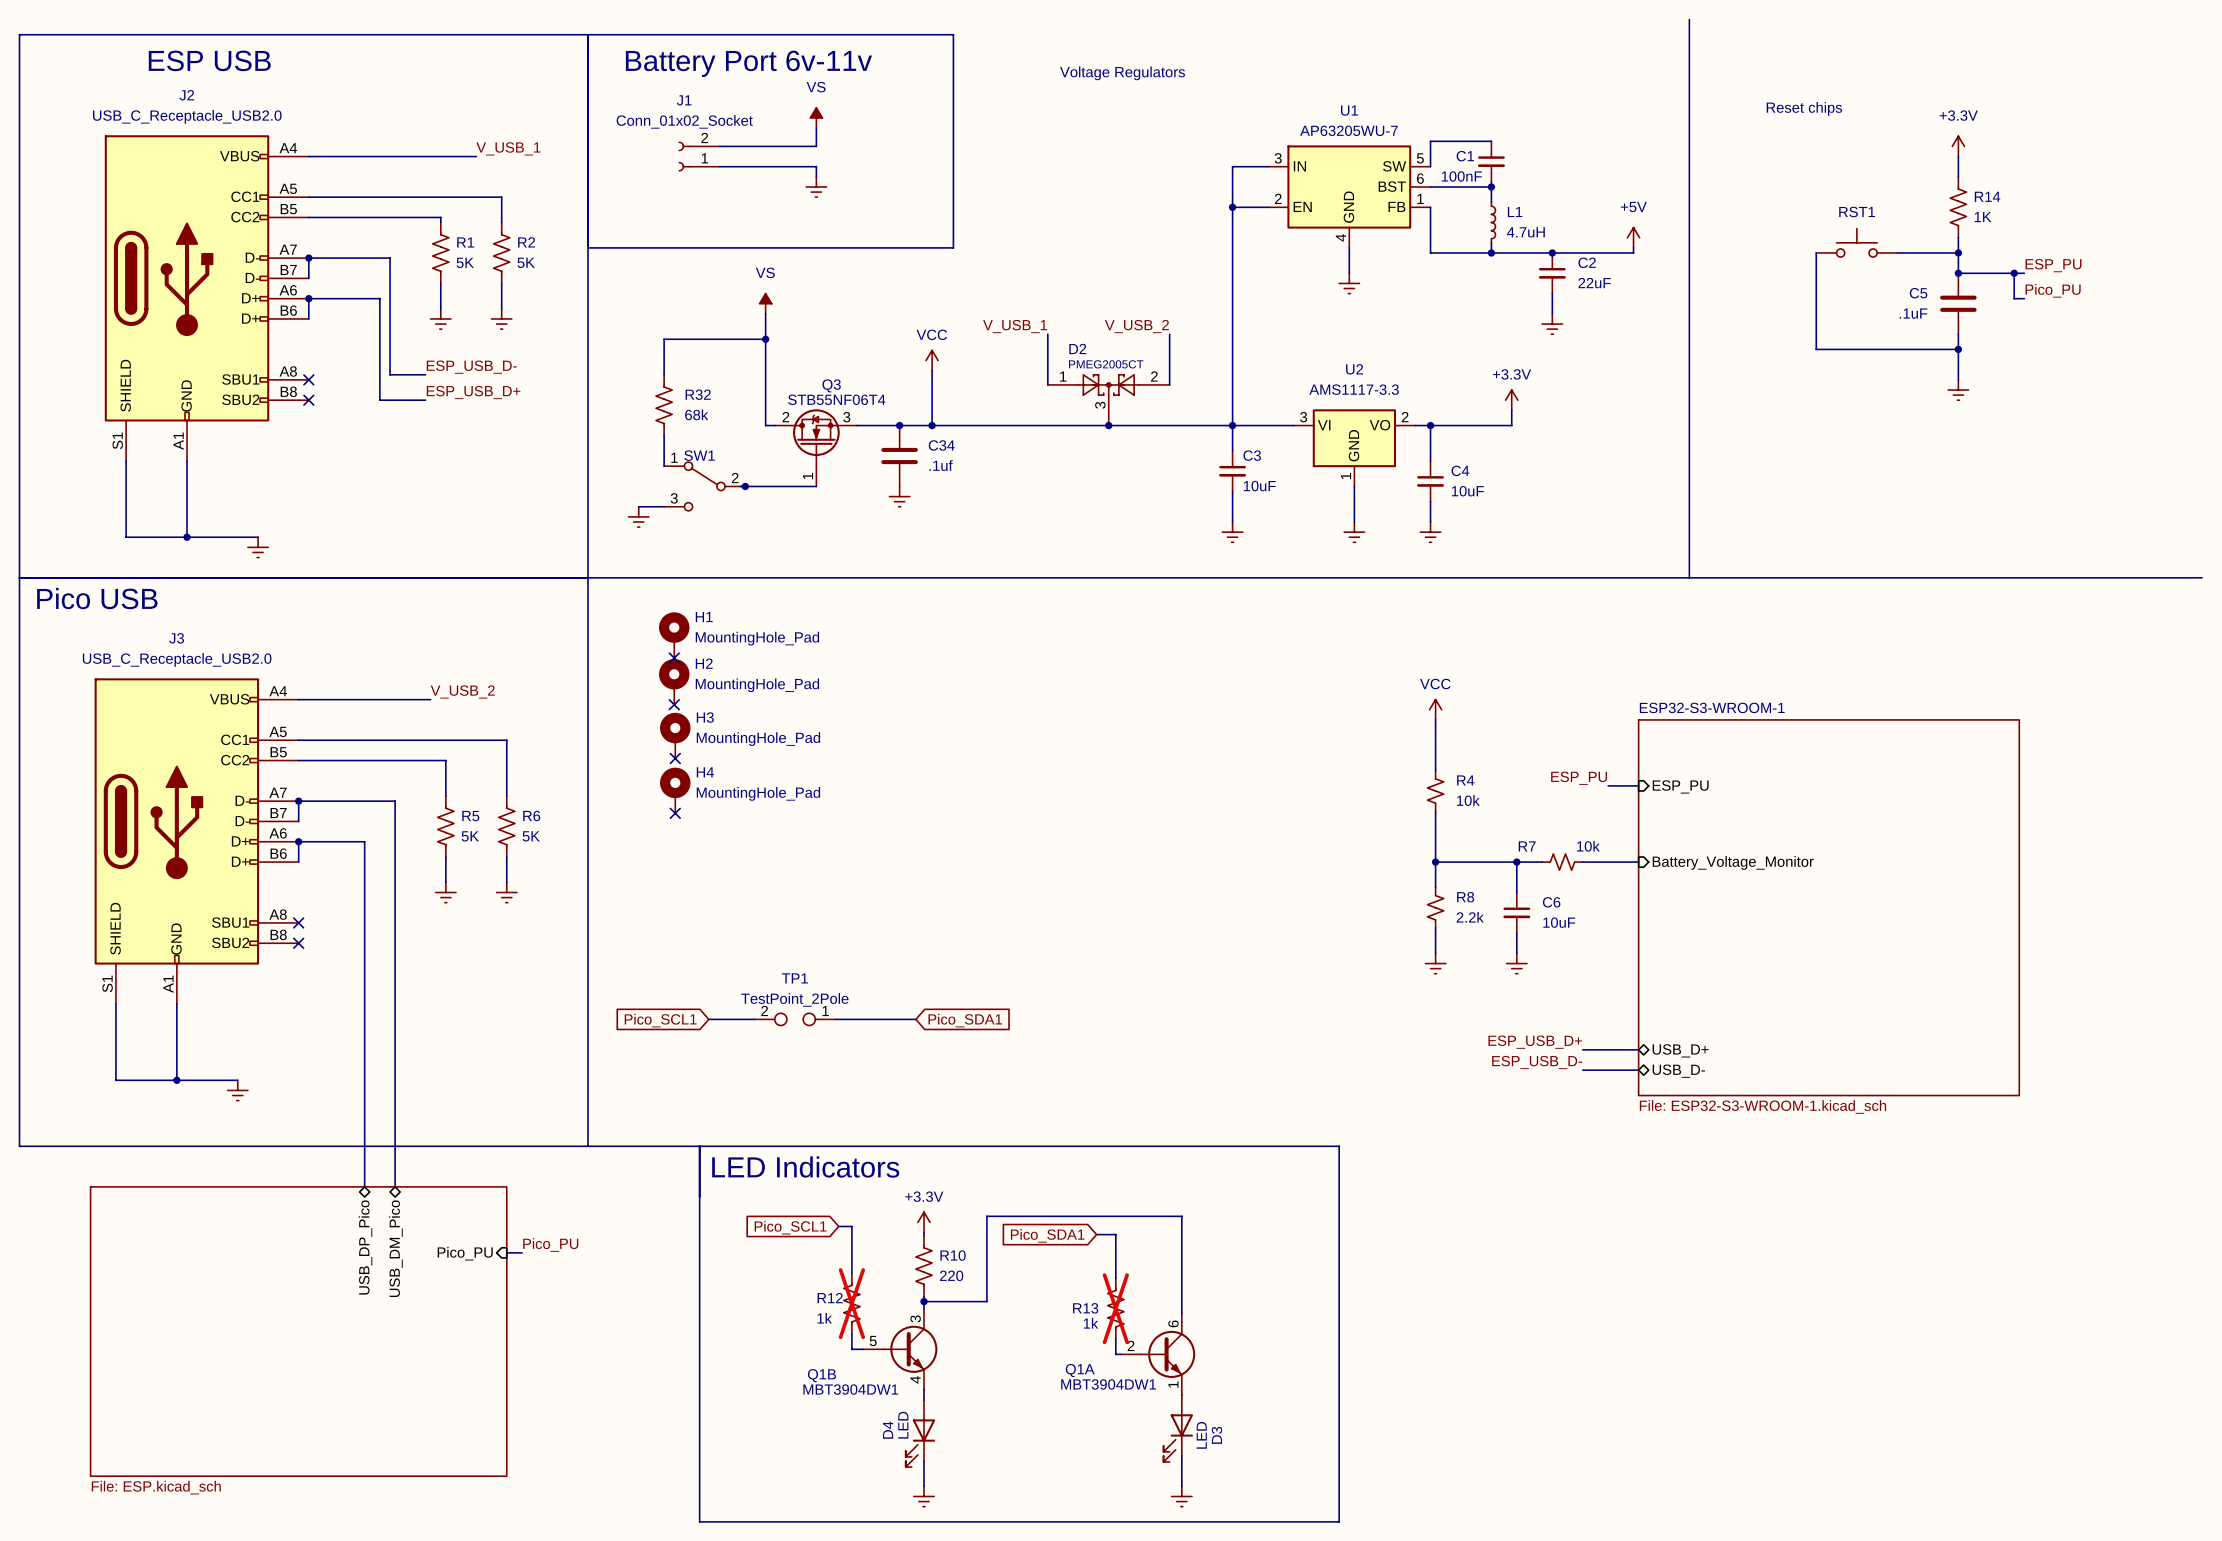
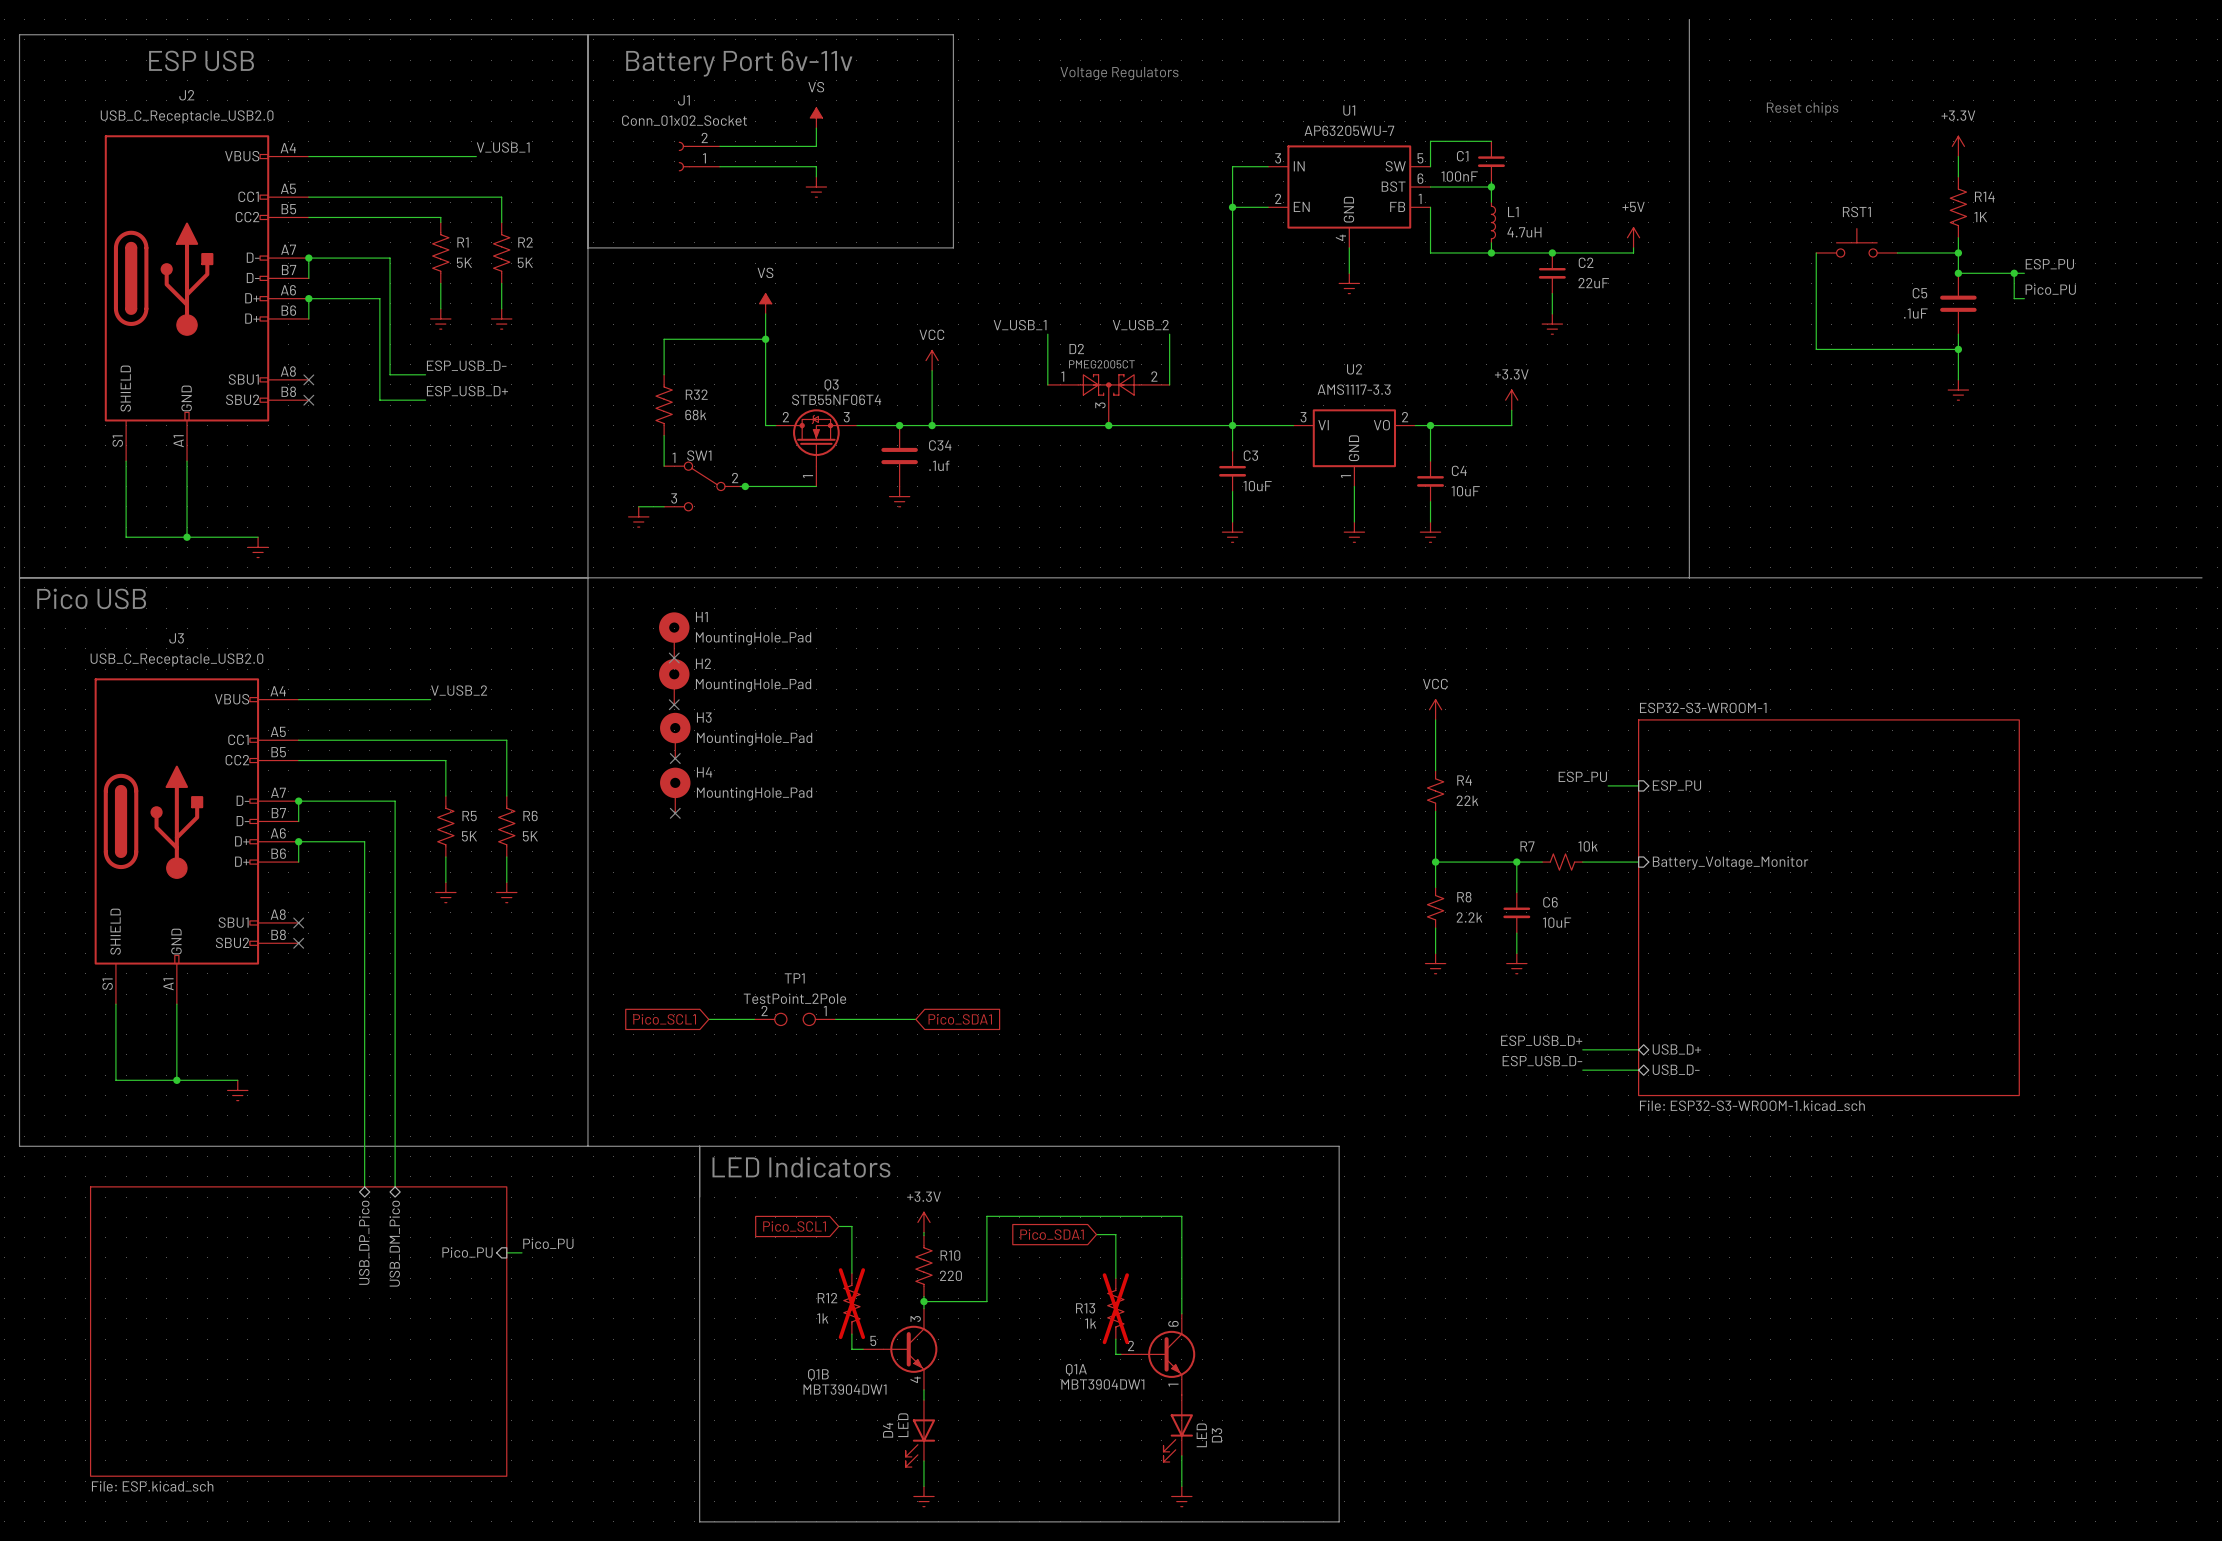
R4 value: 10k (1468, 800) -> 22k (1467, 800)

